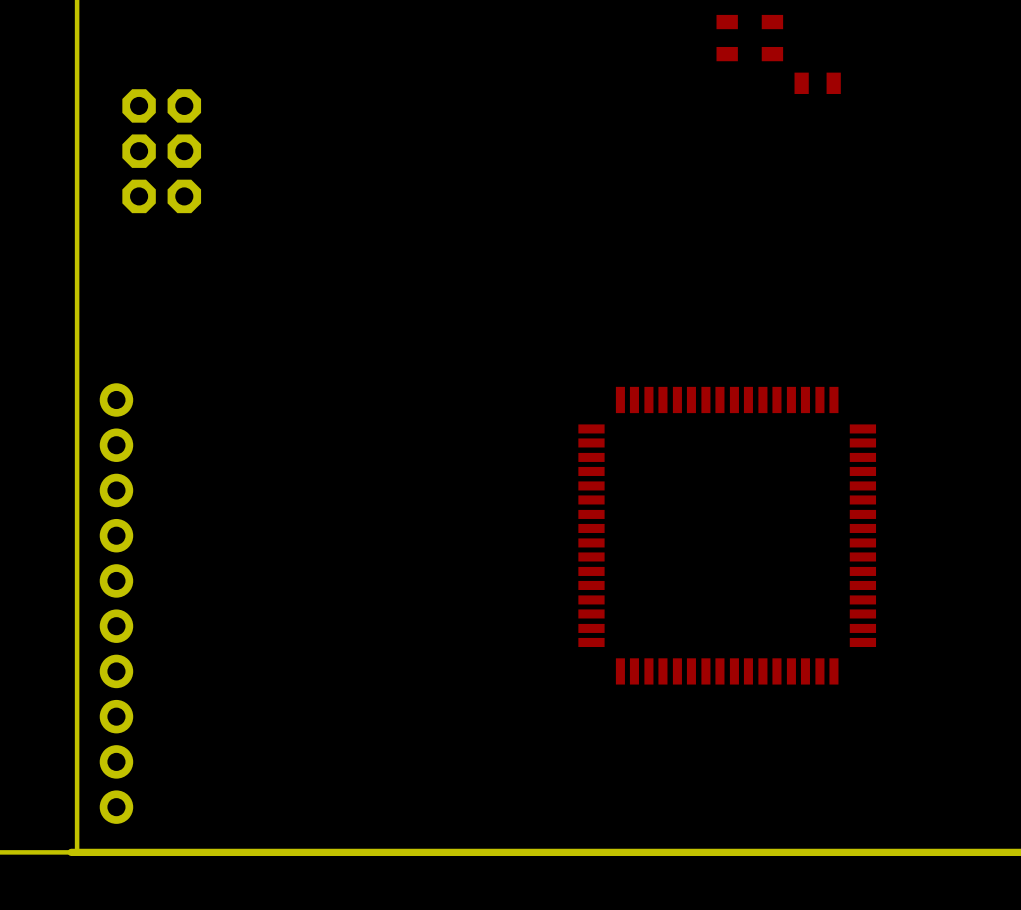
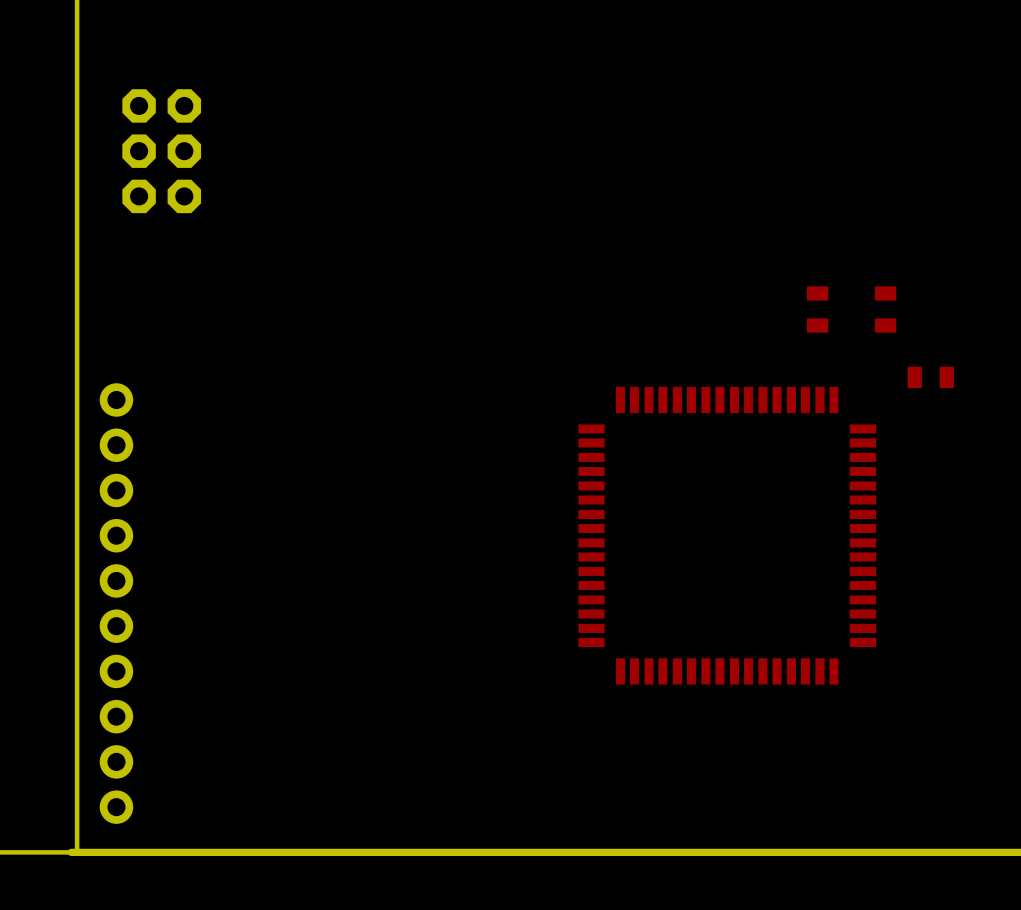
part: (727, 38) -> none
part: (772, 38) -> none
part: (817, 83) -> none
part: none -> (817, 309)
part: none -> (885, 309)
part: none -> (930, 377)

